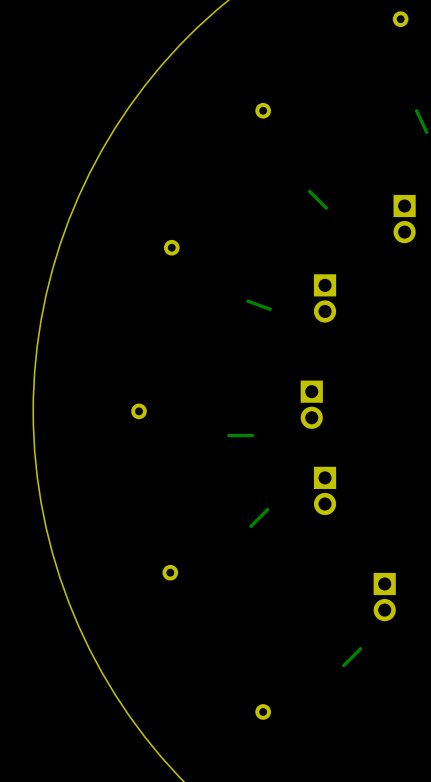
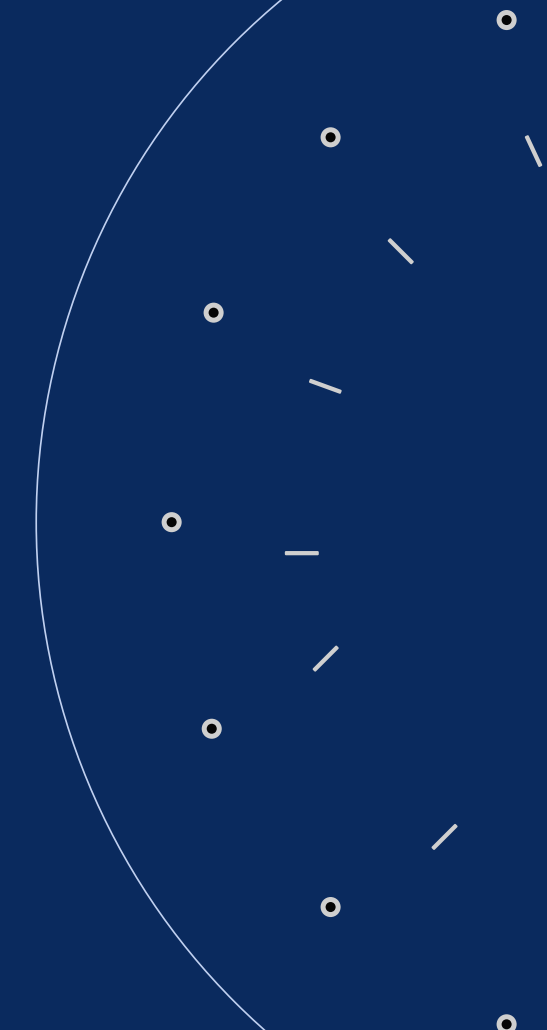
part: (404, 219) -> none
part: (325, 298) -> none
part: (311, 404) -> none
part: (325, 490) -> none
part: (384, 597) -> none

